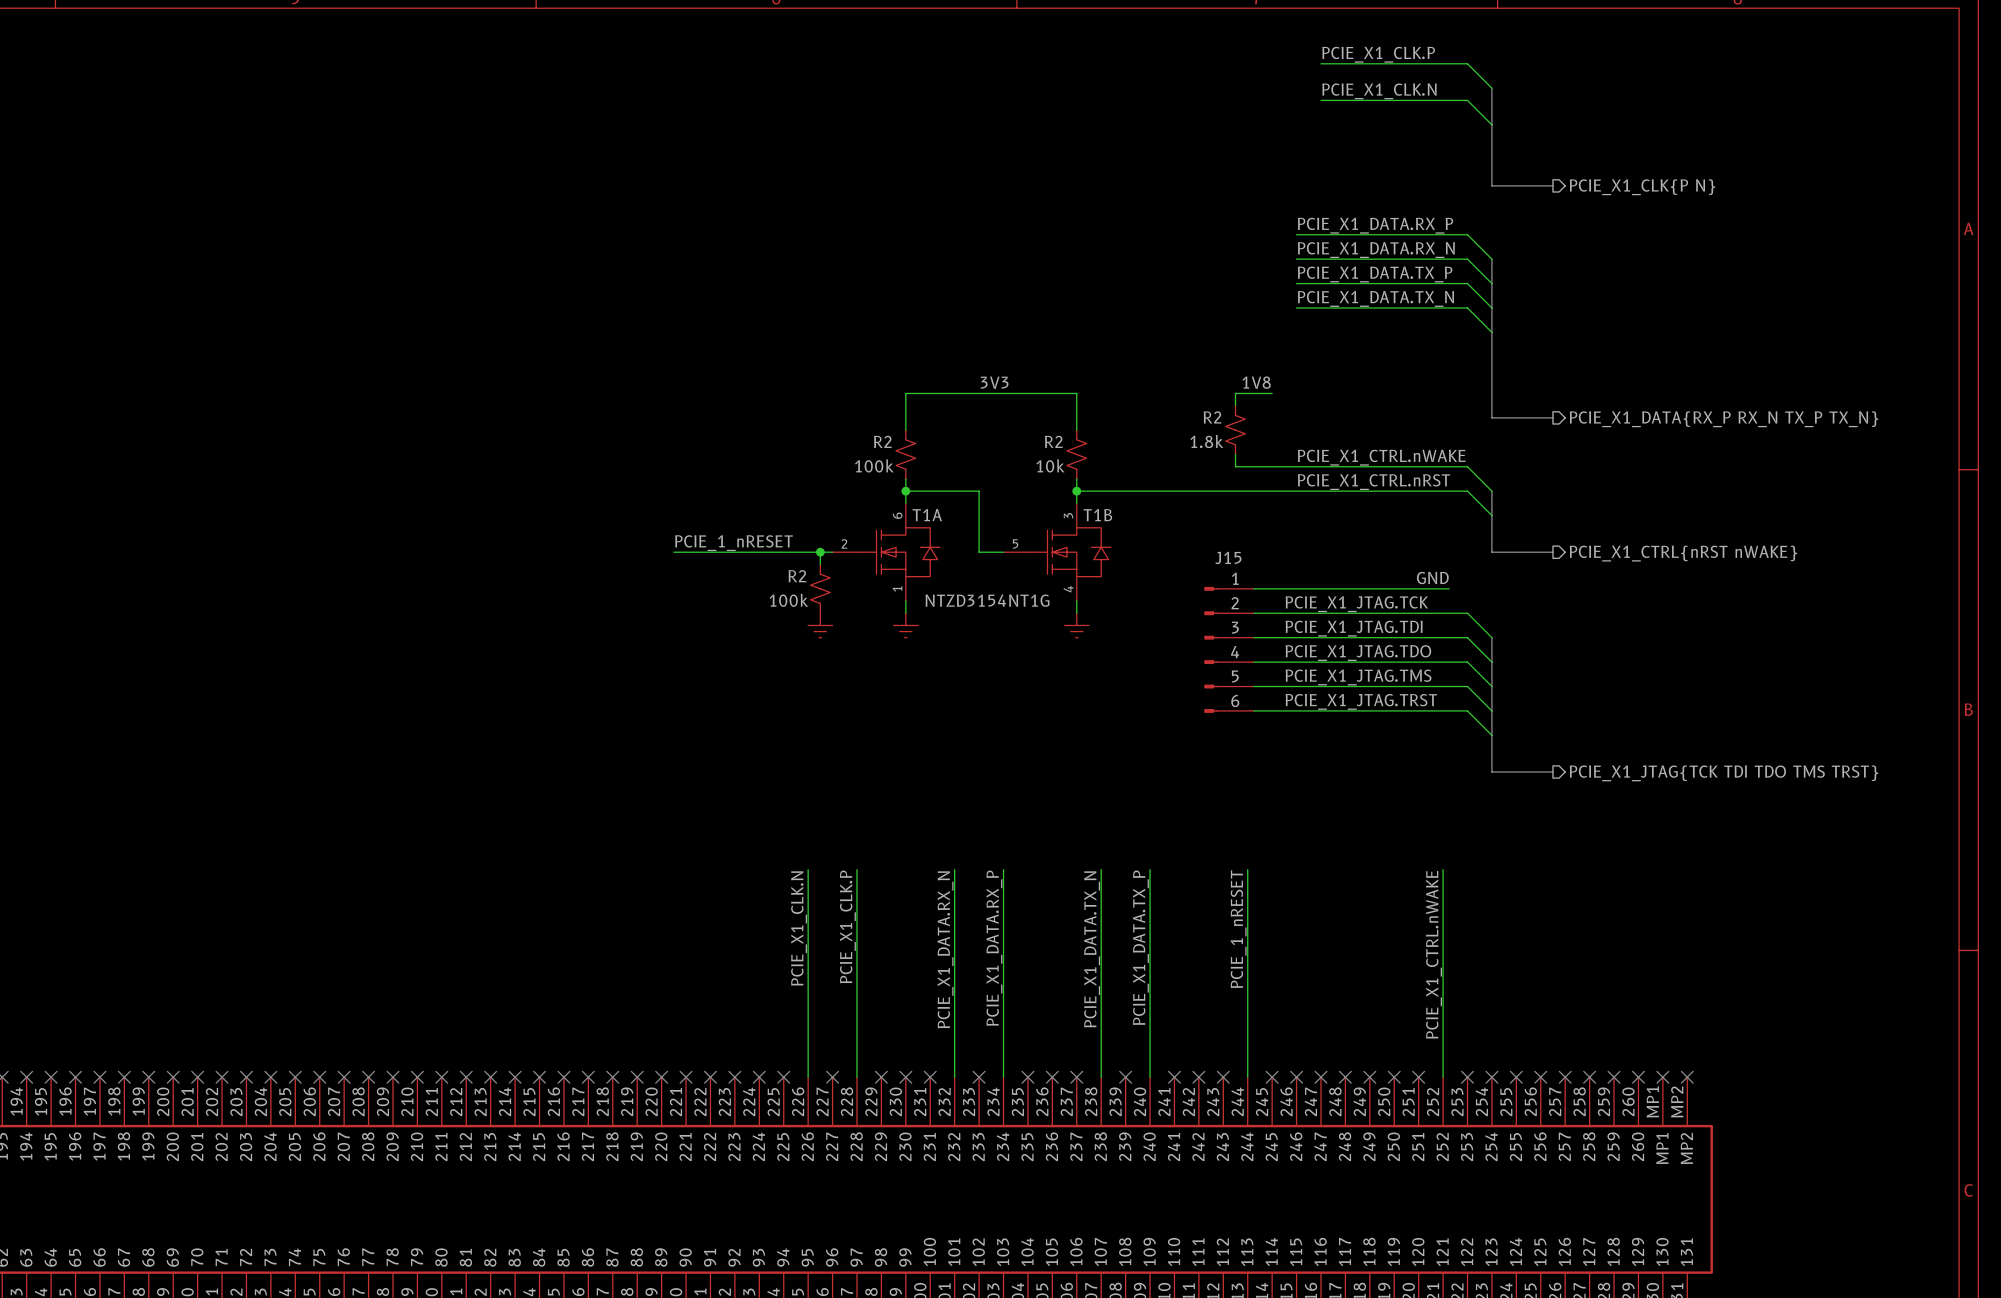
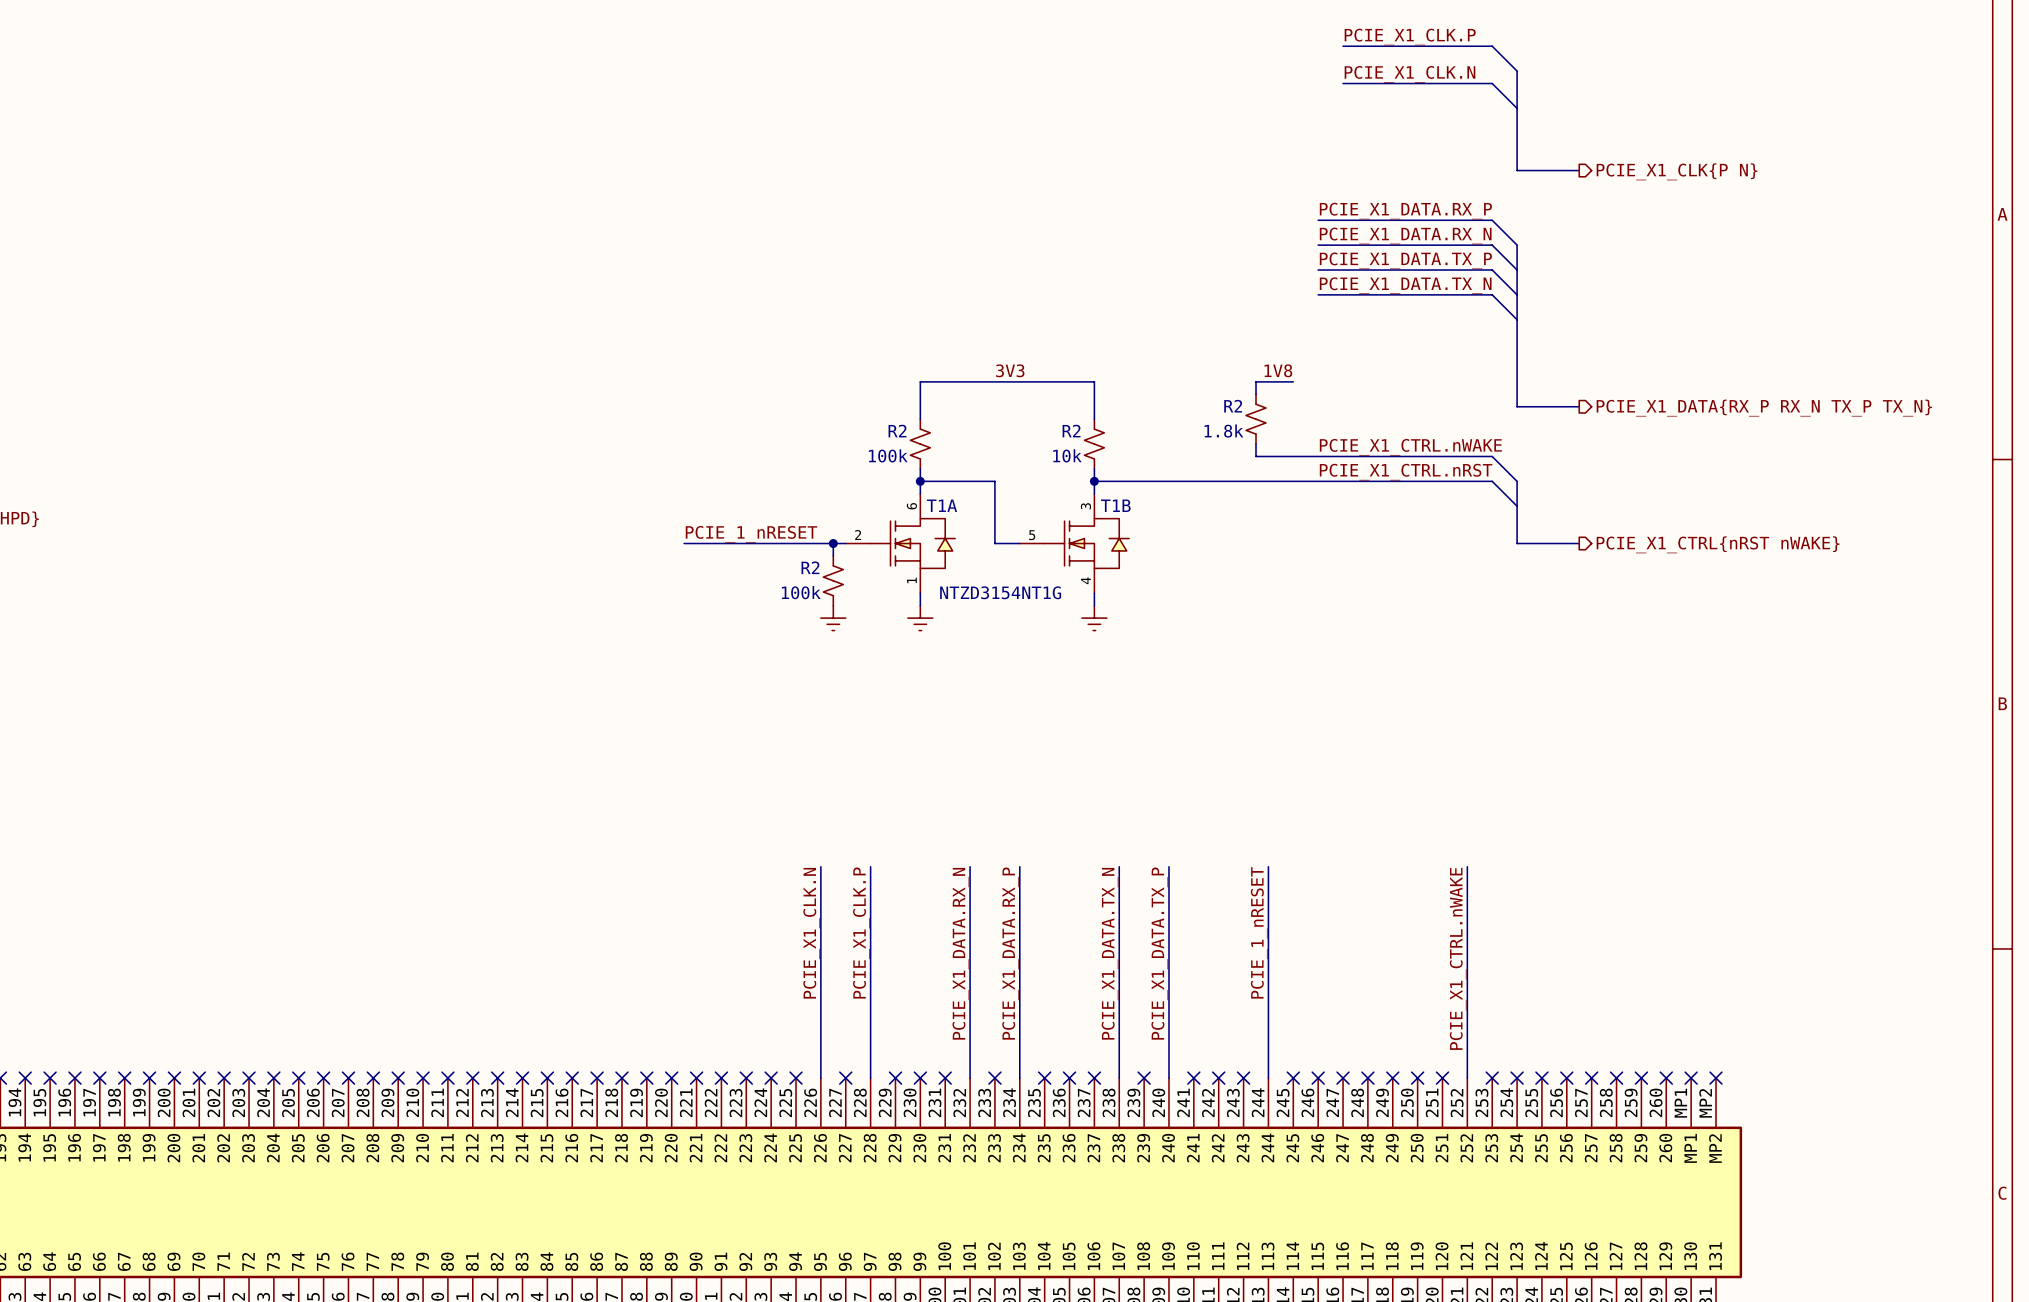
label: GND (1432, 578) -> none
wire: (1253, 588) (1449, 588) -> none
label: PCIE_X1_JTAG.TCK (1356, 604) -> none
wire: (1253, 613) (1467, 613) (1491, 637) -> none
label: PCIE_X1_JTAG.TDI (1354, 628) -> none
wire: (1253, 637) (1467, 637) (1491, 662) -> none
bus: (1491, 637) (1491, 772) (1552, 772) -> none
J15: (1229, 649) -> none
label: PCIE_X1_JTAG.TDO (1358, 653) -> none
wire: (1253, 662) (1467, 662) (1491, 686) -> none
label: PCIE_X1_JTAG.TMS (1358, 677) -> none
wire: (1253, 686) (1467, 686) (1491, 710) -> none
label: PCIE_X1_JTAG.TRST (1361, 701) -> none
wire: (1253, 710) (1467, 710) (1491, 735) -> none
hierarchical label: PCIE_X1_JTAG{TCK TDI TDO TMS TRST} (1724, 773) -> none

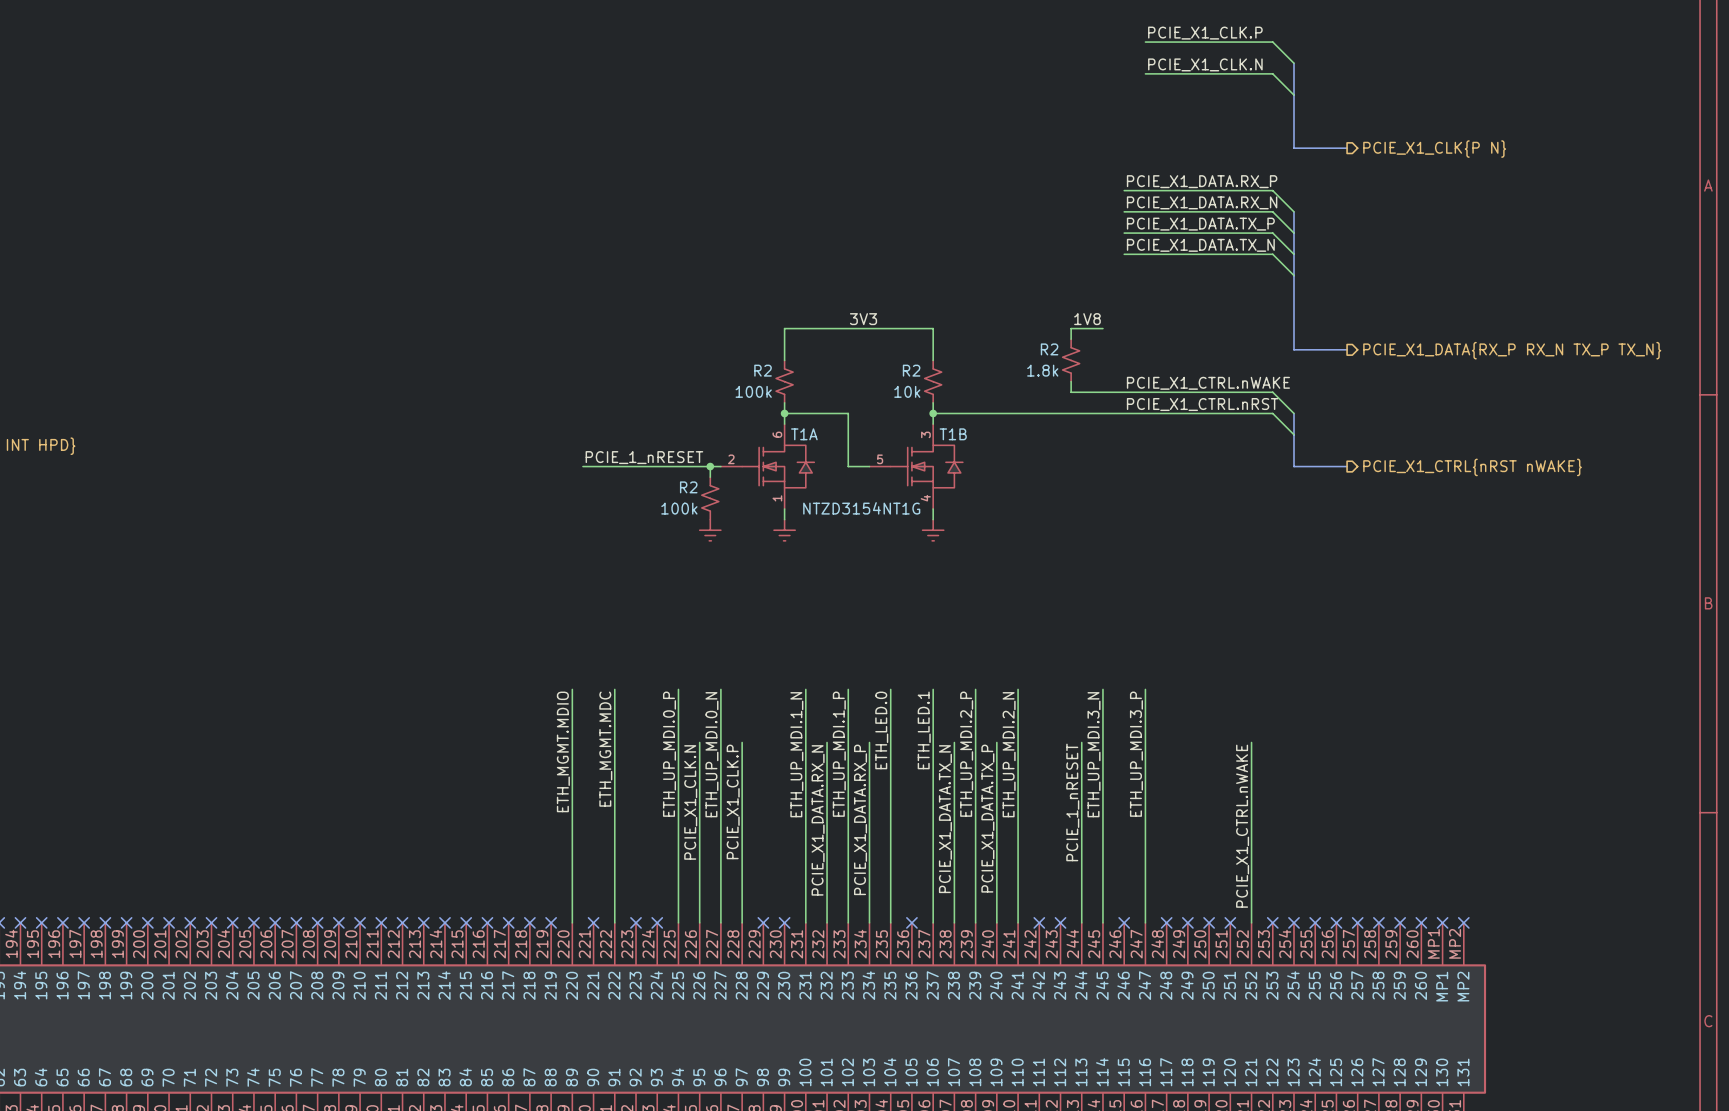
wire: none -> (572, 689) (572, 922)
wire: none -> (614, 689) (614, 922)
wire: none -> (678, 689) (678, 922)
wire: none -> (720, 689) (720, 922)
wire: none -> (805, 689) (805, 922)
wire: none -> (848, 689) (848, 922)
wire: none -> (890, 689) (890, 922)
wire: none -> (933, 689) (933, 922)
wire: none -> (975, 689) (975, 922)
wire: none -> (1018, 689) (1018, 922)
wire: none -> (1102, 689) (1102, 922)
wire: none -> (1145, 689) (1145, 922)
label: none -> ETH_LED.0 (881, 730)
label: none -> ETH_LED.1 (924, 730)
label: none -> ETH_MGMT.MDC (605, 749)
label: none -> ETH_MGMT.MDIO (563, 751)
label: none -> ETH_UP_MDI.0_P (669, 754)
label: none -> ETH_UP_MDI.0_N (711, 754)
label: none -> ETH_UP_MDI.1_N (796, 754)
label: none -> ETH_UP_MDI.1_P (839, 754)
label: none -> ETH_UP_MDI.2_P (966, 754)
label: none -> ETH_UP_MDI.2_N (1009, 754)
label: none -> ETH_UP_MDI.3_N (1094, 754)
label: none -> ETH_UP_MDI.3_P (1136, 754)
no-connect mark: (671, 1078) -> none
no-connect mark: (721, 1078) -> none
no-connect mark: (796, 1078) -> none
no-connect mark: (845, 1078) -> none
no-connect mark: (945, 1078) -> none
no-connect mark: (994, 1078) -> none
no-connect mark: (1044, 1078) -> none
no-connect mark: (1094, 1078) -> none
no-connect mark: (1144, 1078) -> none
no-connect mark: (1193, 1078) -> none
no-connect mark: (1293, 1078) -> none
no-connect mark: (1343, 1078) -> none

